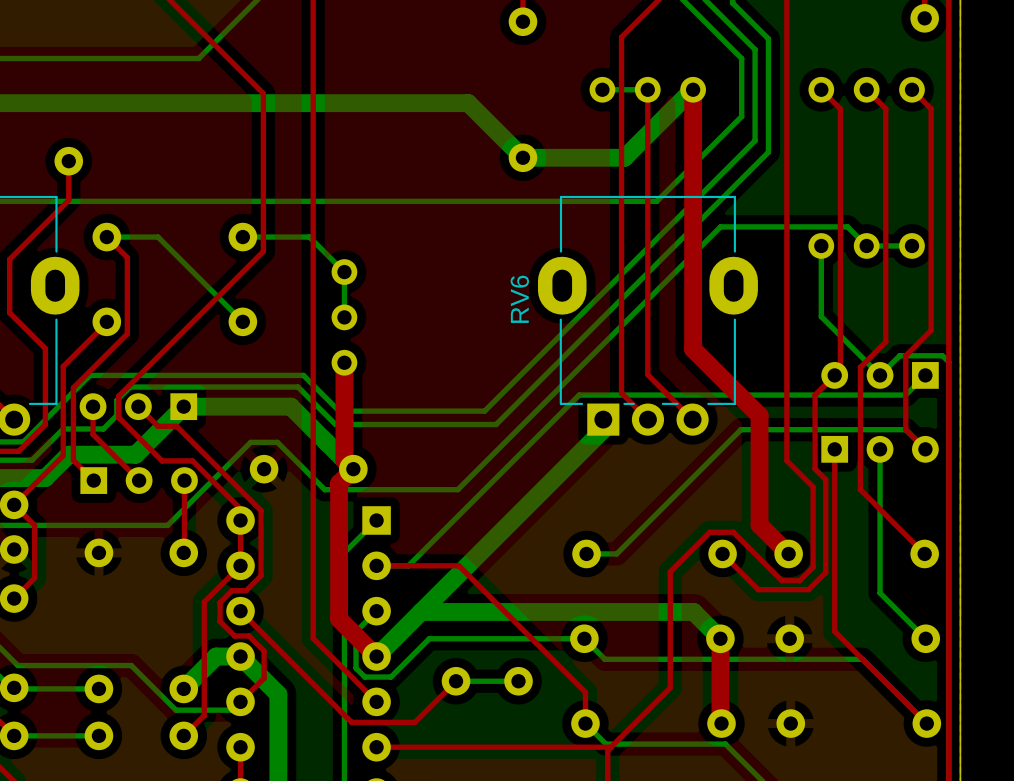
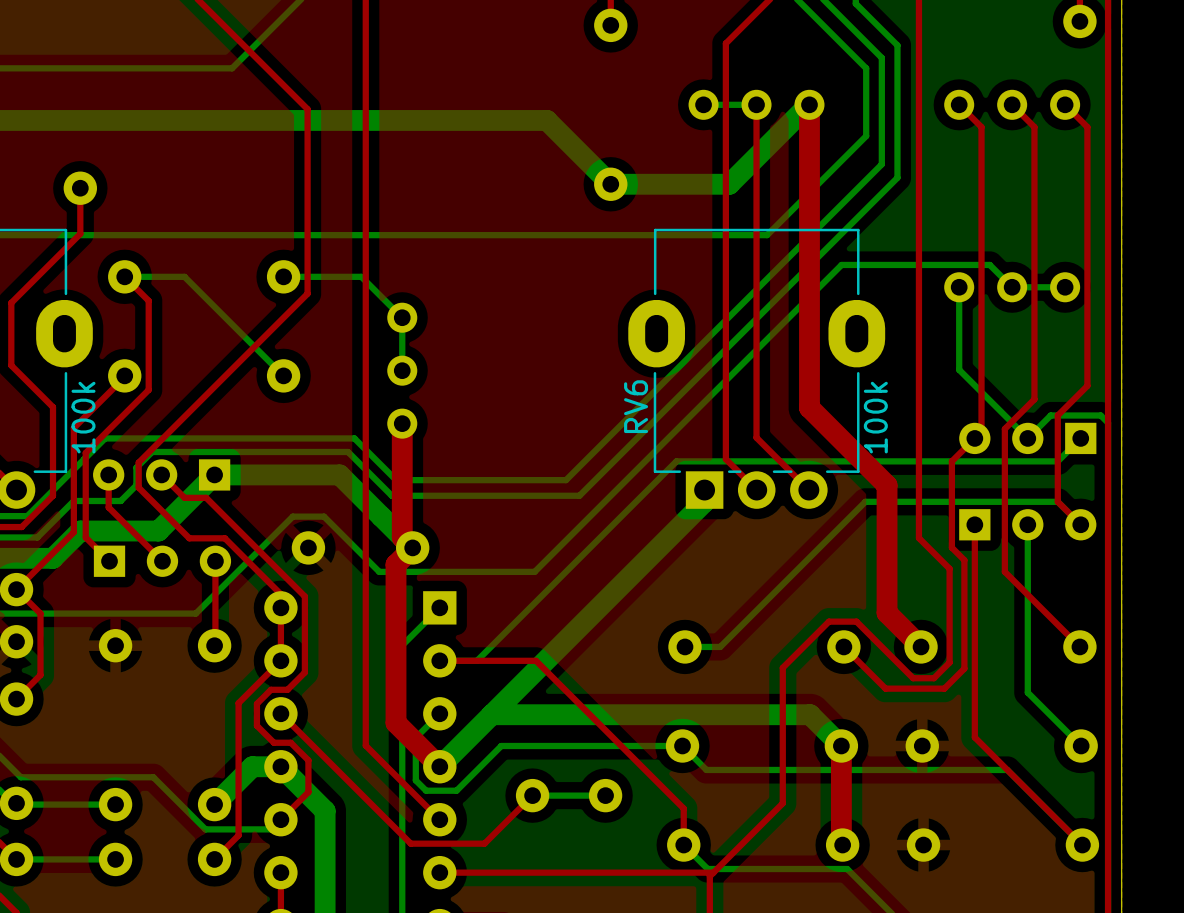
RV6 name position: RV6 (519, 299) -> RV6 (636, 406)
part value: none -> 100k (83, 417)
RV6 value: none -> 100k (875, 417)

